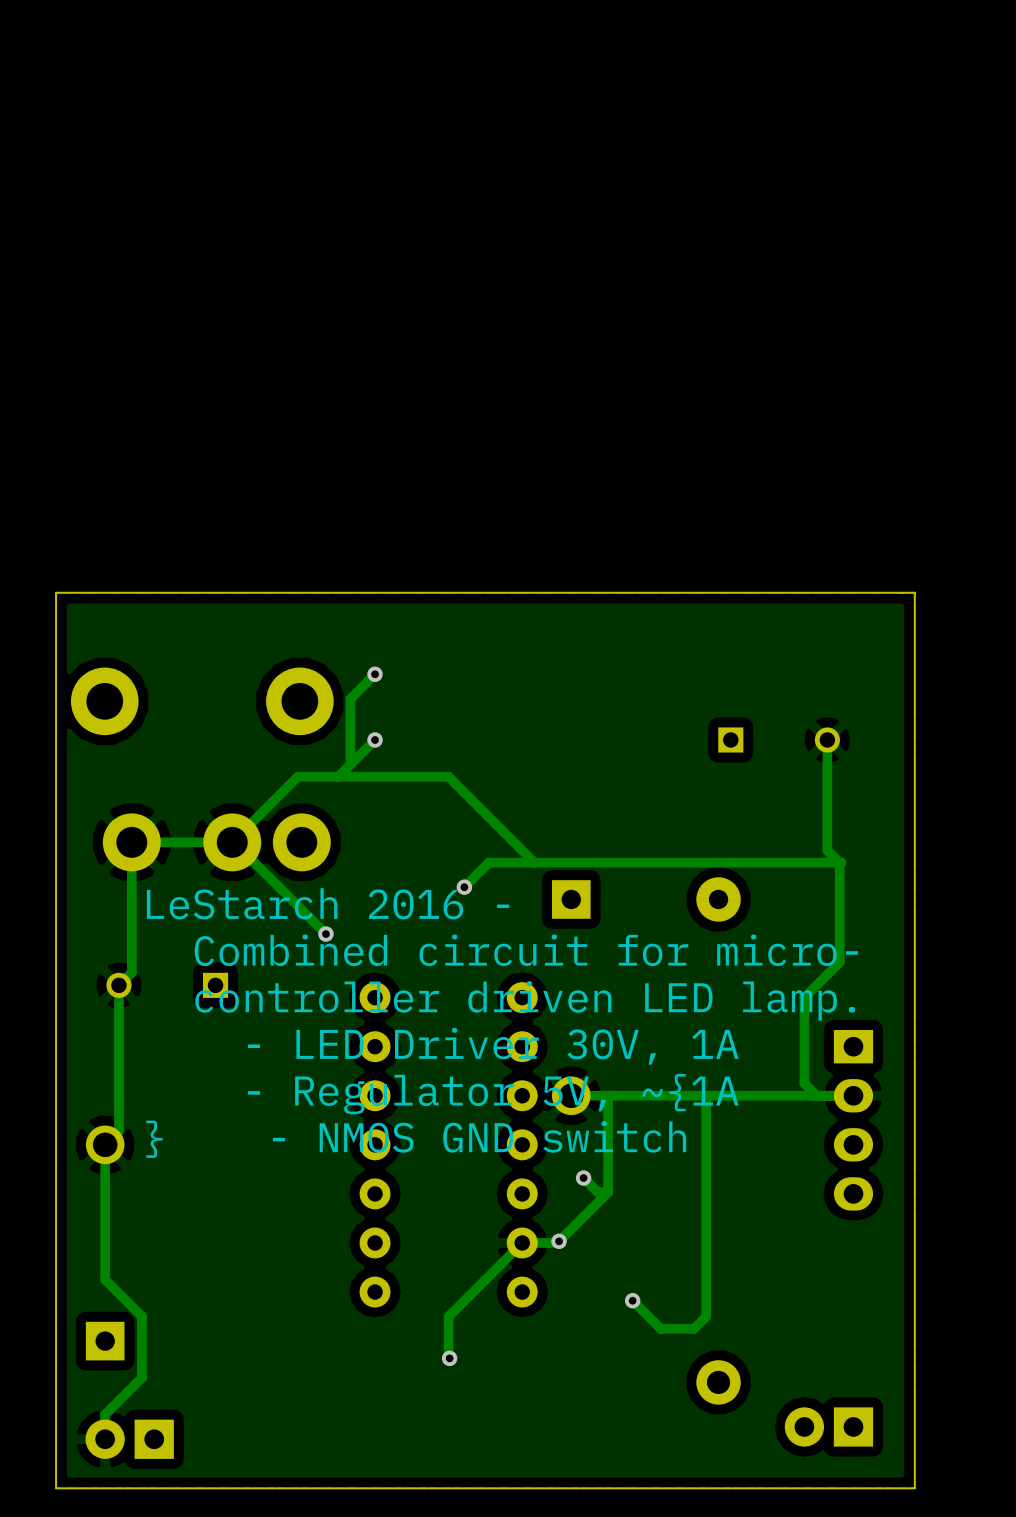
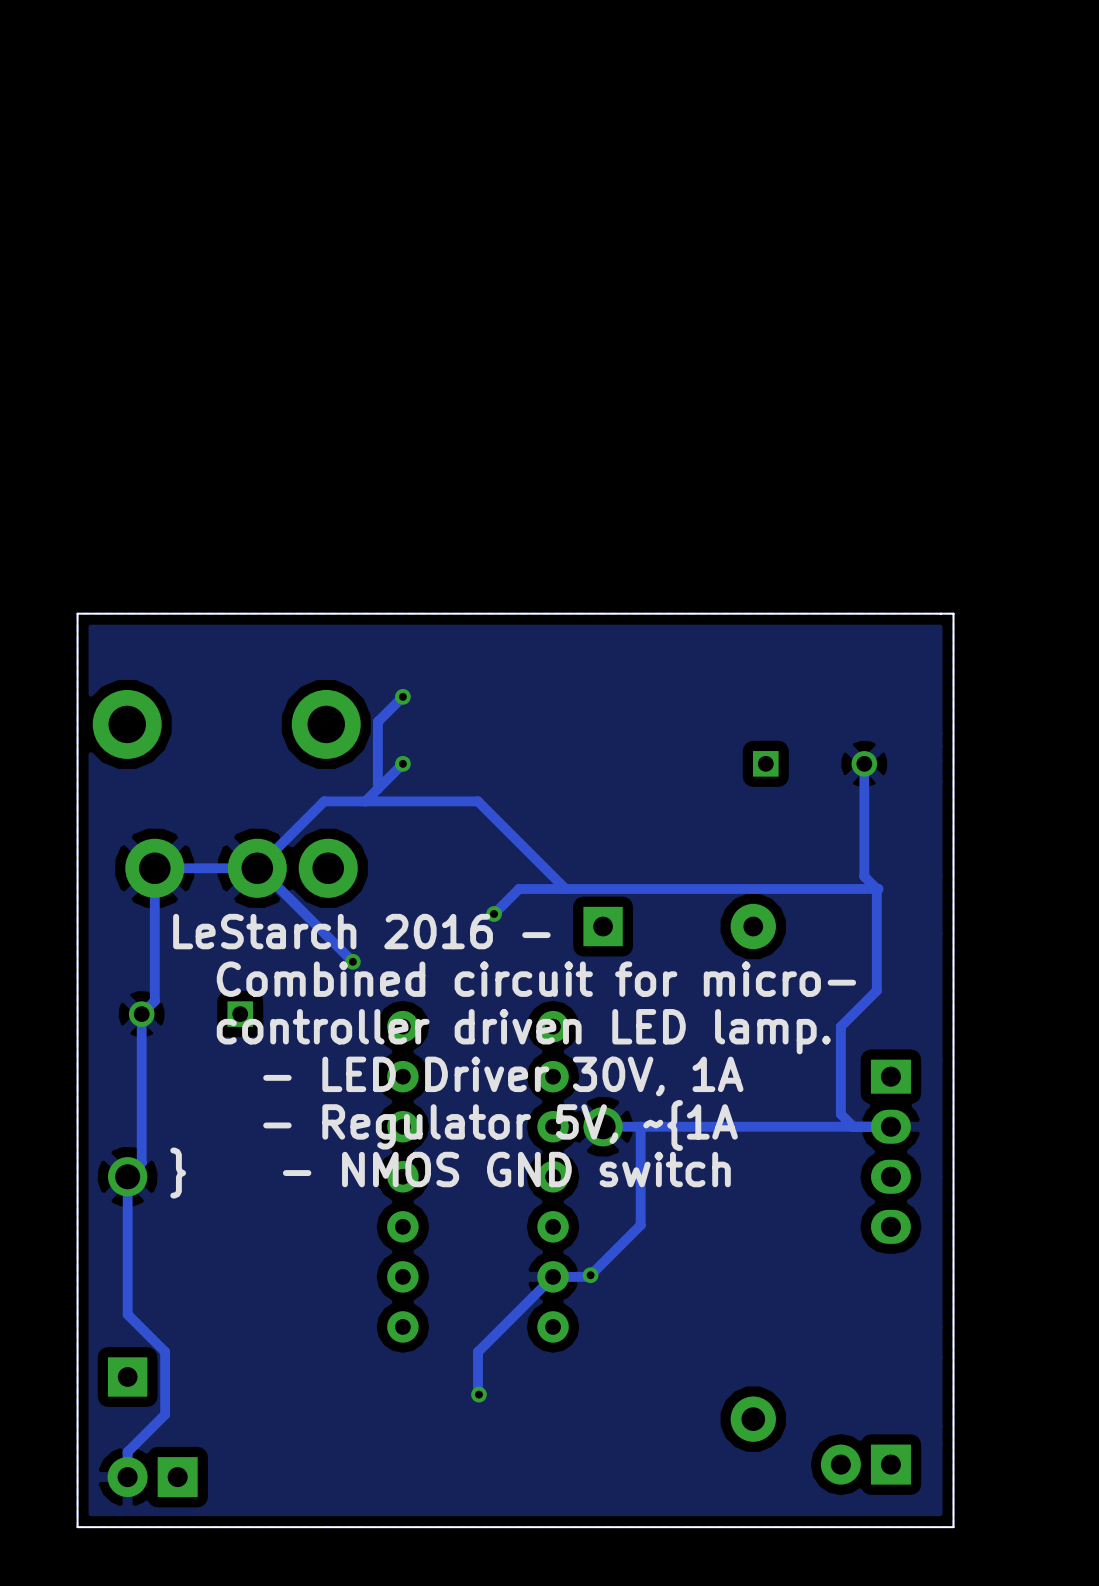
track: (706, 1095) (706, 1316) (694, 1328) (660, 1328) (632, 1300) -> none
track: (583, 1178) (597, 1192) (608, 1192) -> none
via: (583, 1178) -> none
via: (632, 1300) -> none

